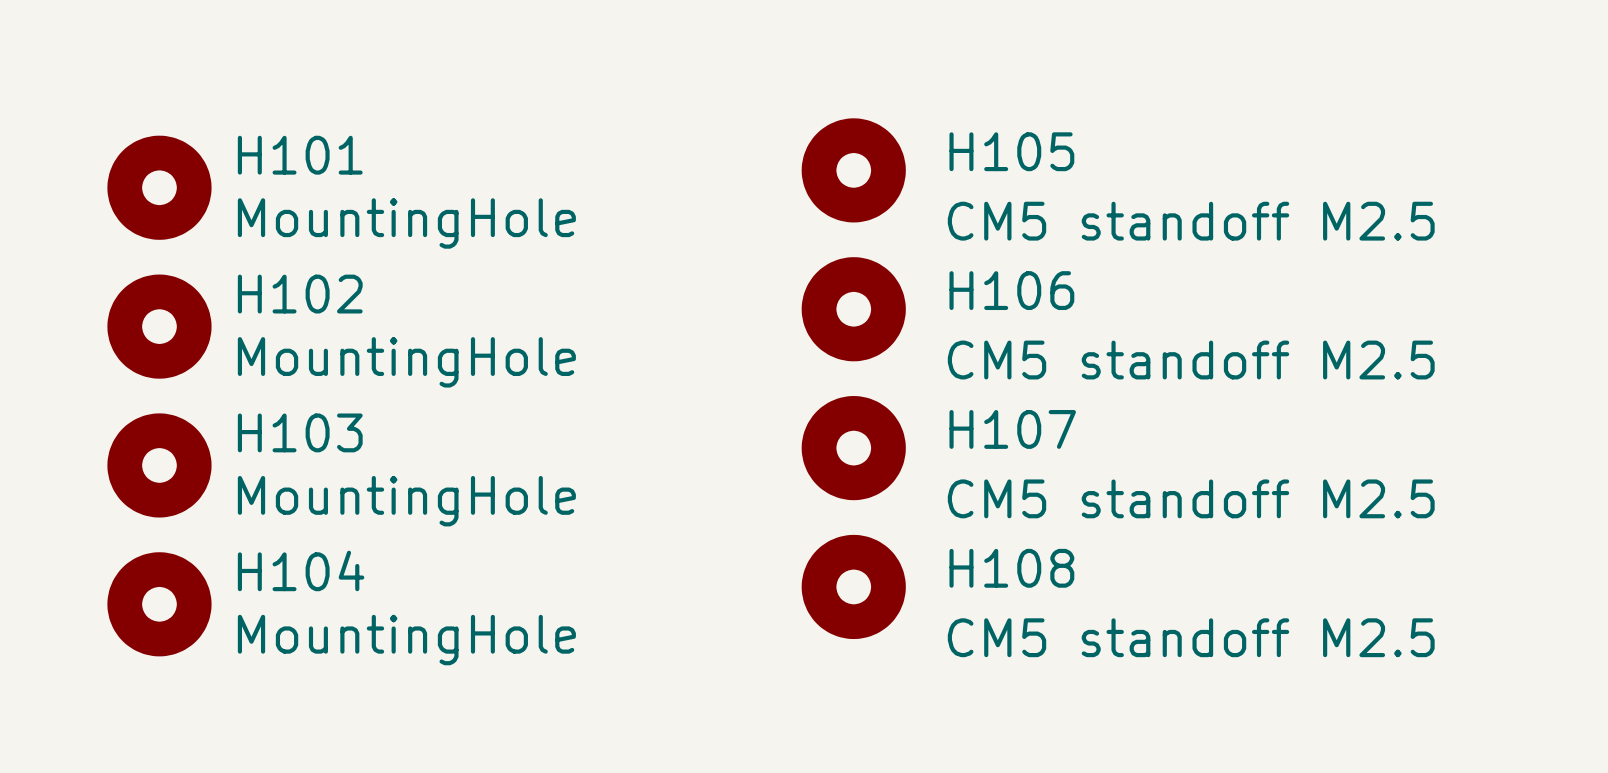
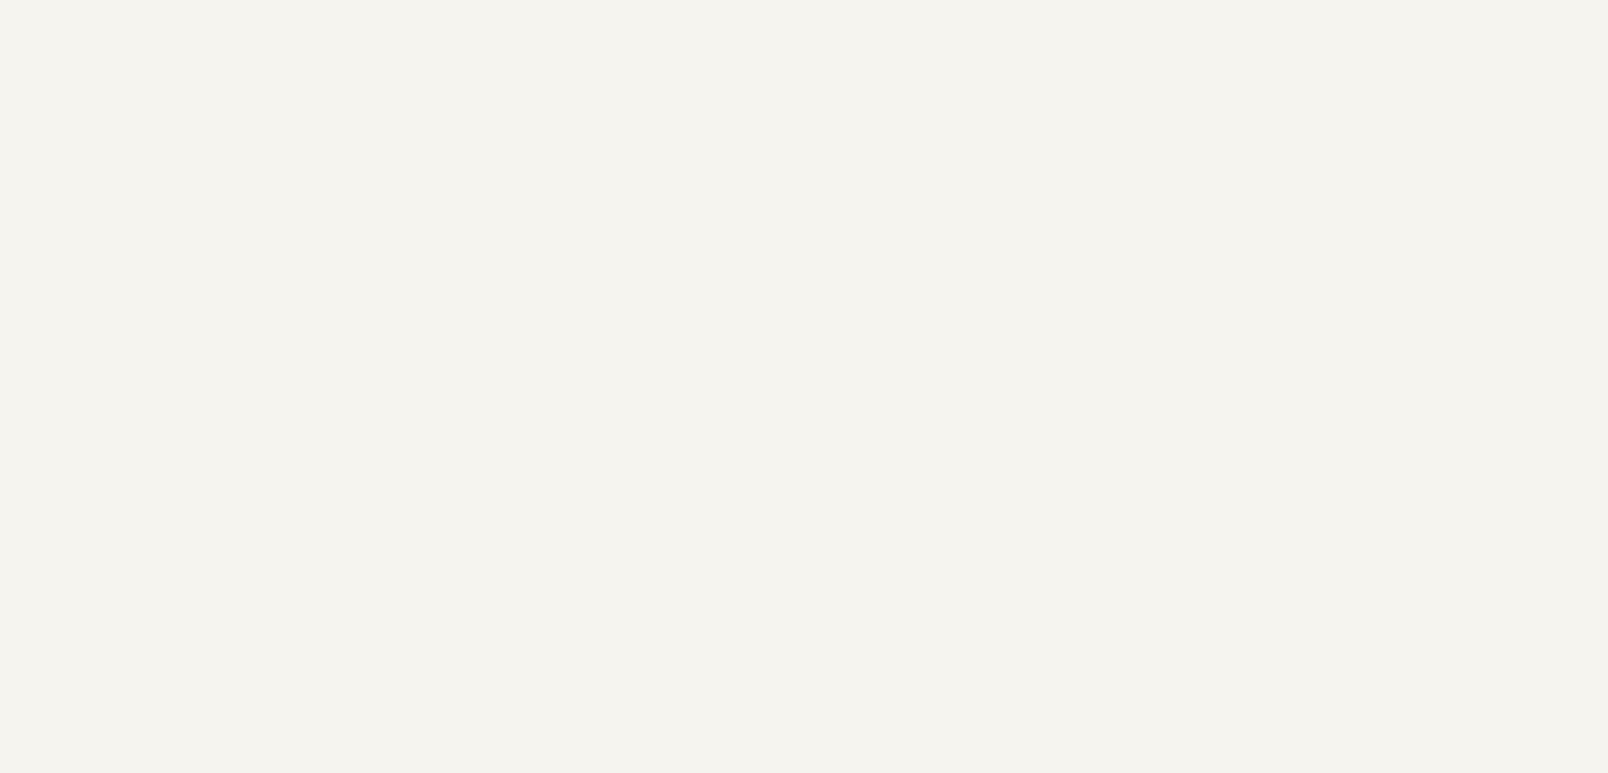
H105: CM5 standoff M2.5 (853, 170) -> none
H101: MountingHole (159, 187) -> none
H106: CM5 standoff M2.5 (853, 309) -> none
H102: MountingHole (159, 326) -> none
H107: CM5 standoff M2.5 (853, 448) -> none
H103: MountingHole (159, 465) -> none
H108: CM5 standoff M2.5 (853, 586) -> none
H104: MountingHole (159, 604) -> none

